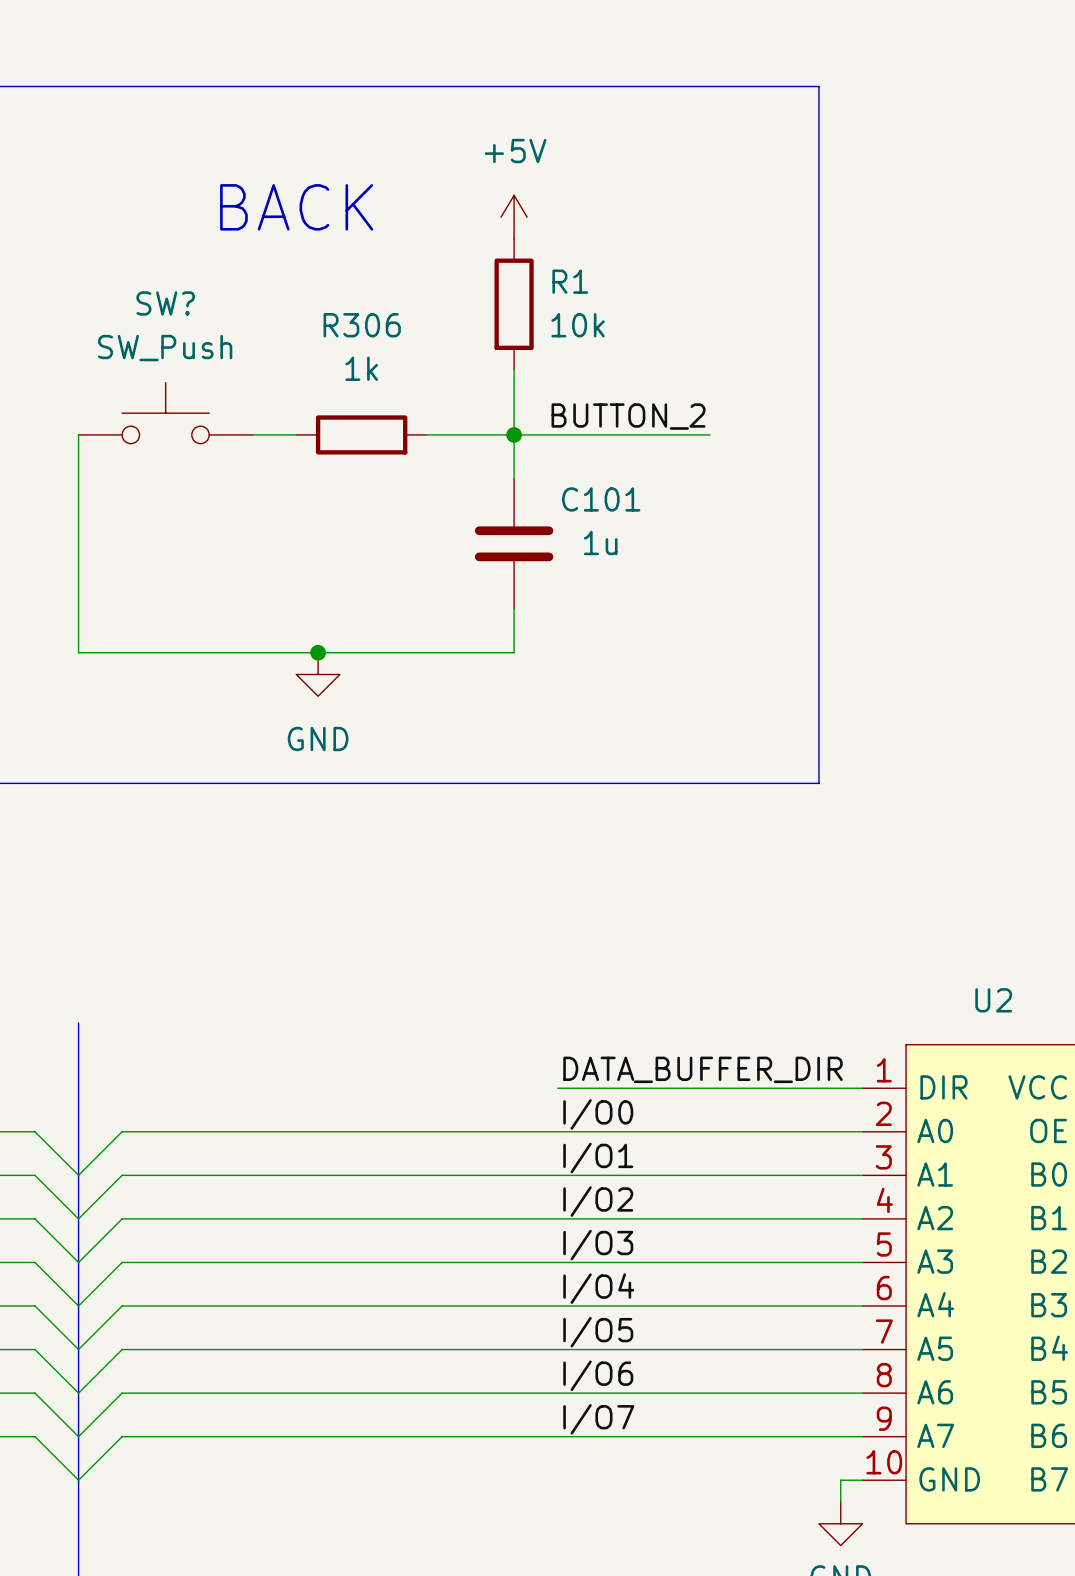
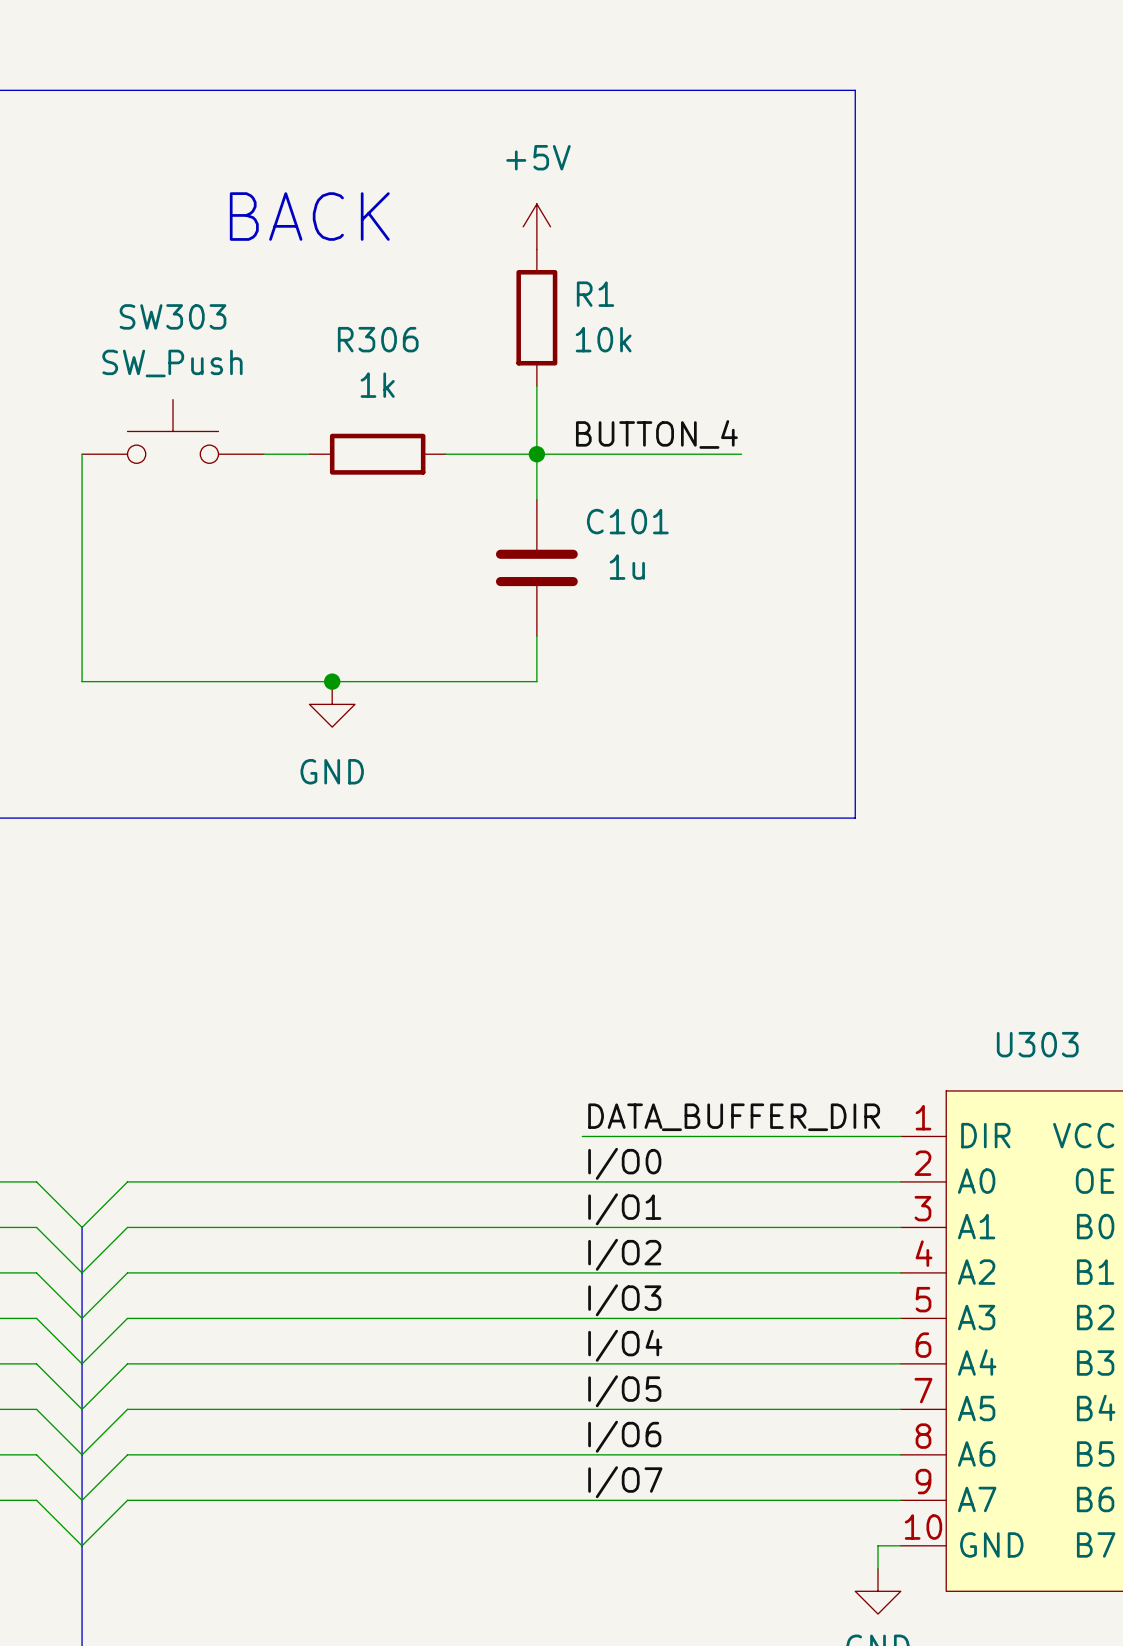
SW? name: SW? (165, 303) -> SW303 (173, 316)
label: BUTTON_2 (628, 416) -> BUTTON_4 (656, 434)
U2 name: U2 (993, 1000) -> U303 (1037, 1044)
bus: (78, 1022) (78, 1175) -> none

